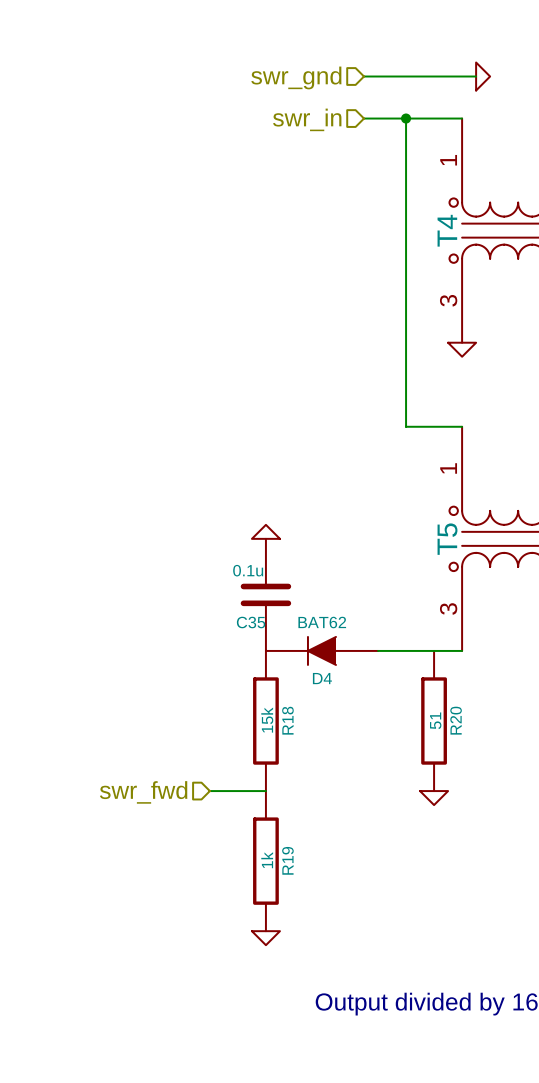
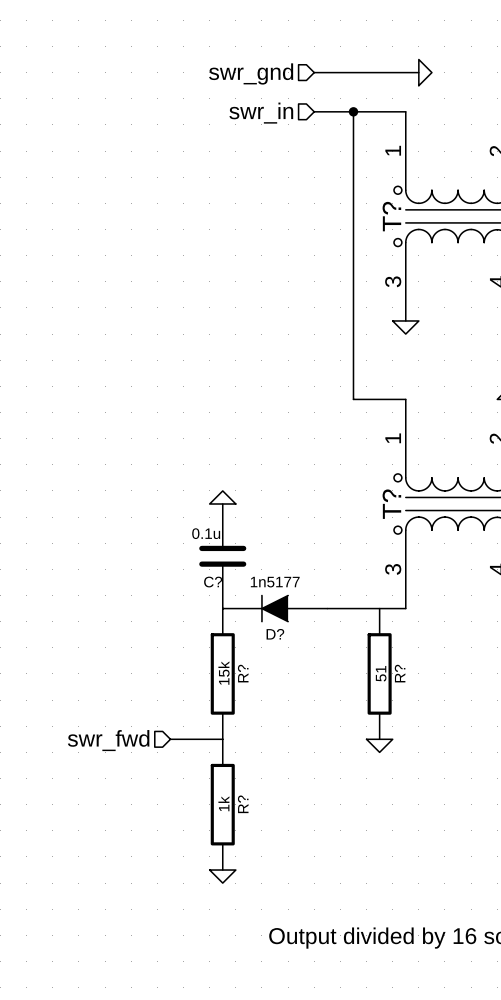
T4 name: T4 (447, 230) -> T? (391, 216)
T5 name: T5 (447, 539) -> T? (391, 504)
C35 name: C35 (251, 622) -> C? (213, 582)
D4 value: BAT62 (322, 622) -> 1n5177 (275, 582)
D4 name: D4 (322, 678) -> D? (275, 634)
R18 name: R18 (287, 720) -> R? (243, 673)
R20 name: R20 (456, 720) -> R? (400, 673)
R19 name: R19 (287, 860) -> R? (243, 804)

